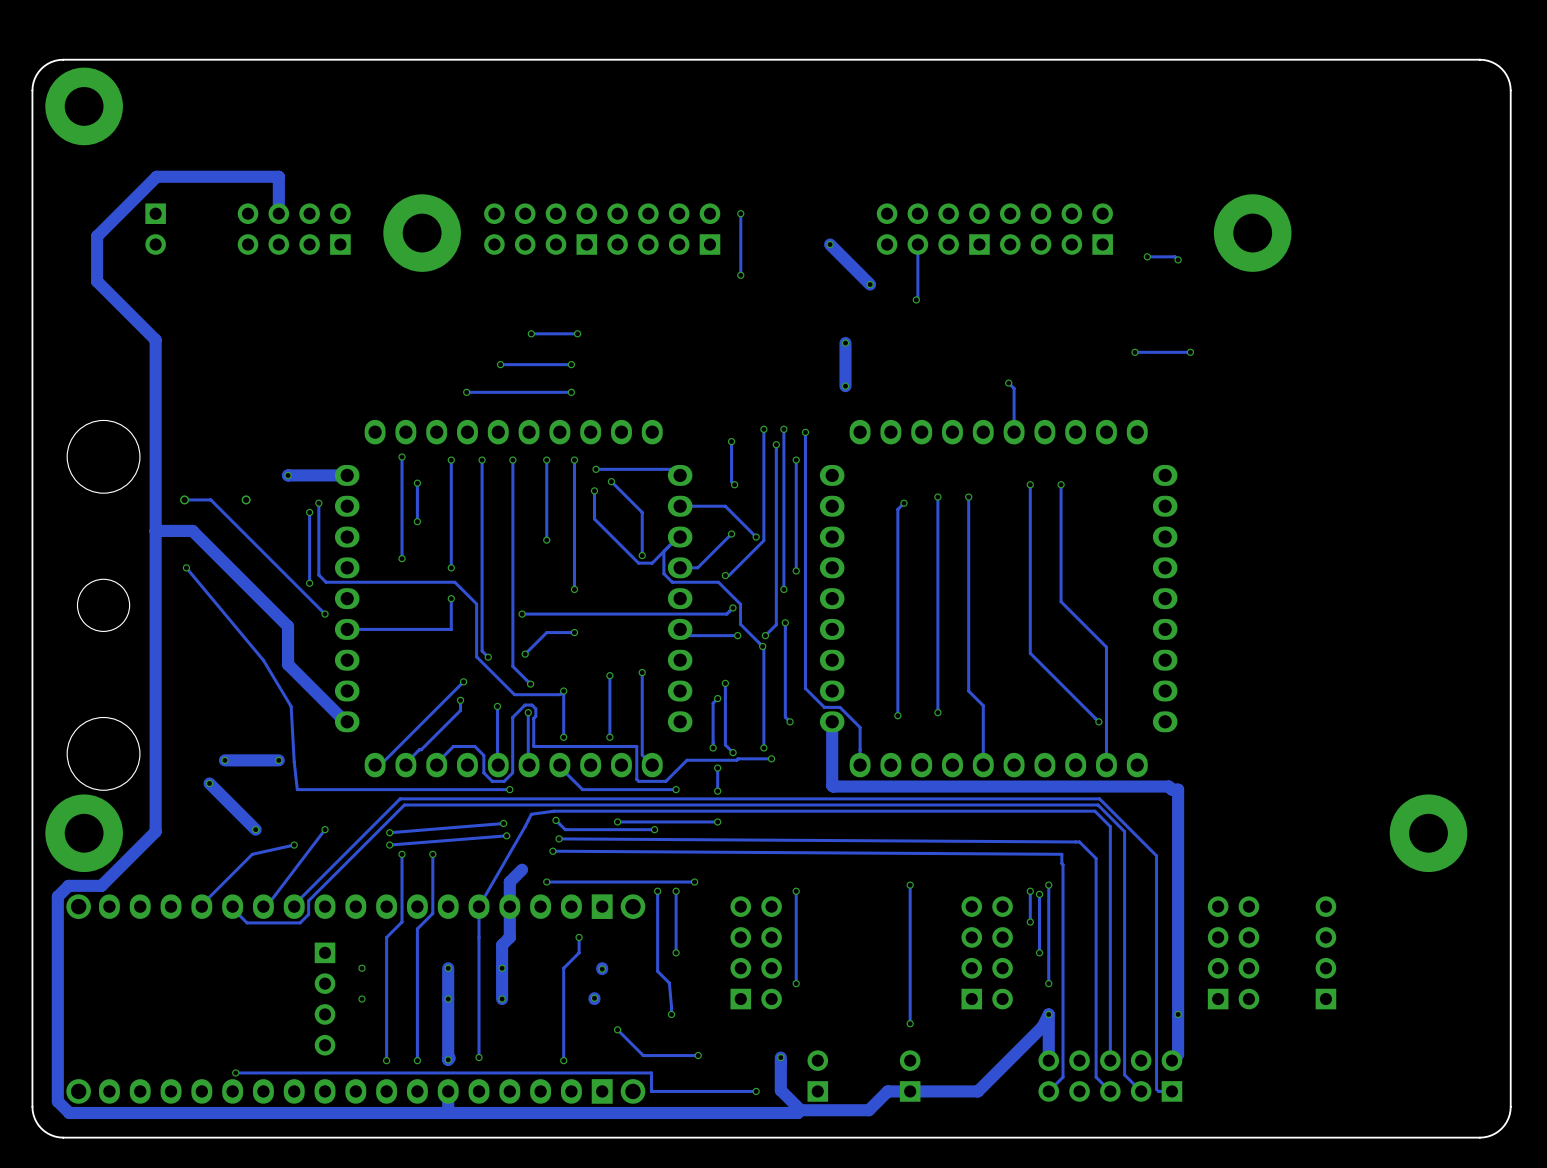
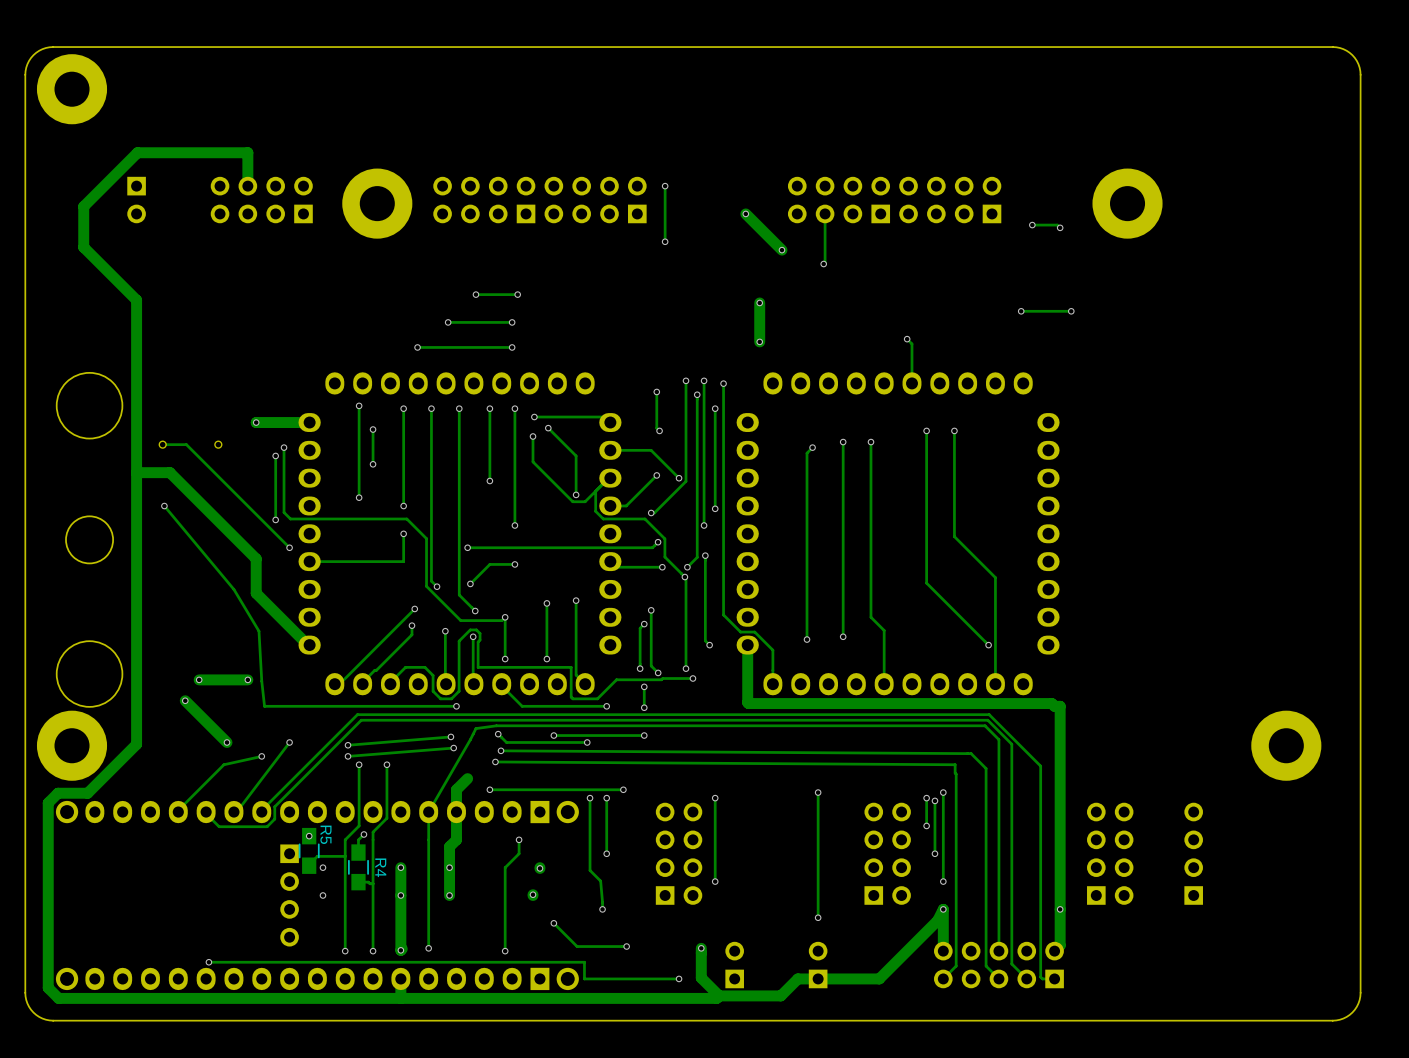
track: none -> (363, 834) (358, 839) (358, 852)
via: none -> (363, 834)
via: none -> (309, 836)
R5: none -> (309, 850)
track: none -> (345, 856) (317, 856) (309, 865)
R4: none -> (358, 867)
track: none -> (358, 882) (373, 883)

